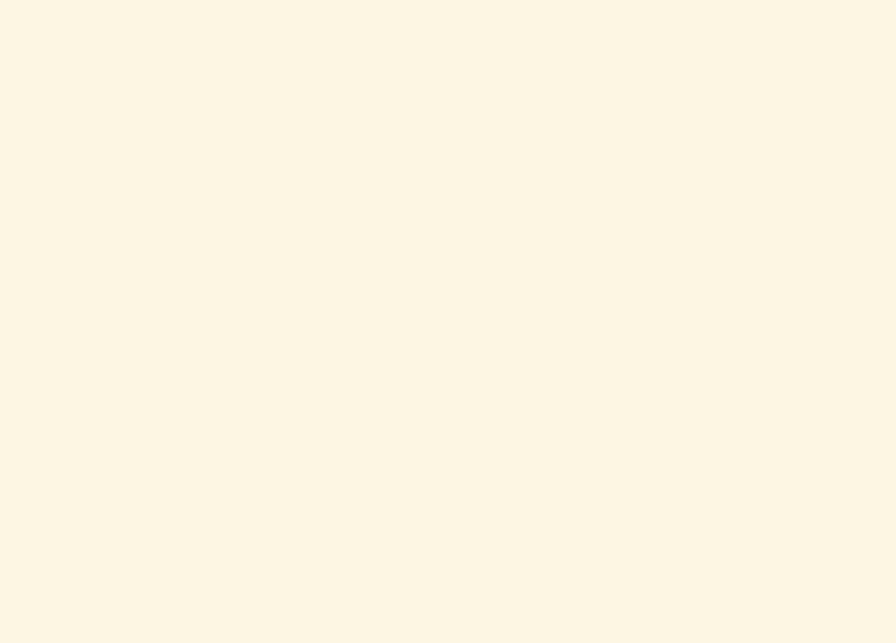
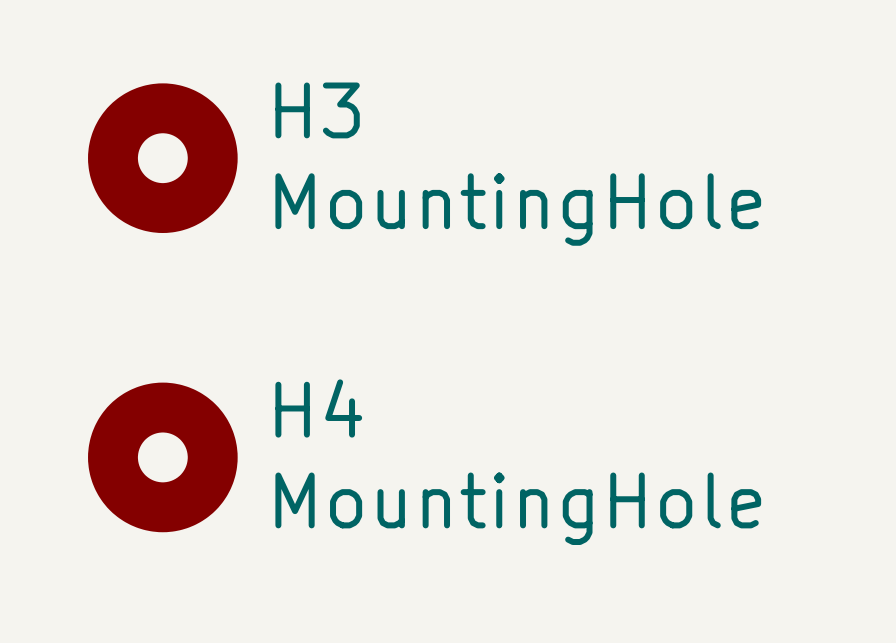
H3: none -> MountingHole (162, 158)
H4: none -> MountingHole (162, 457)

